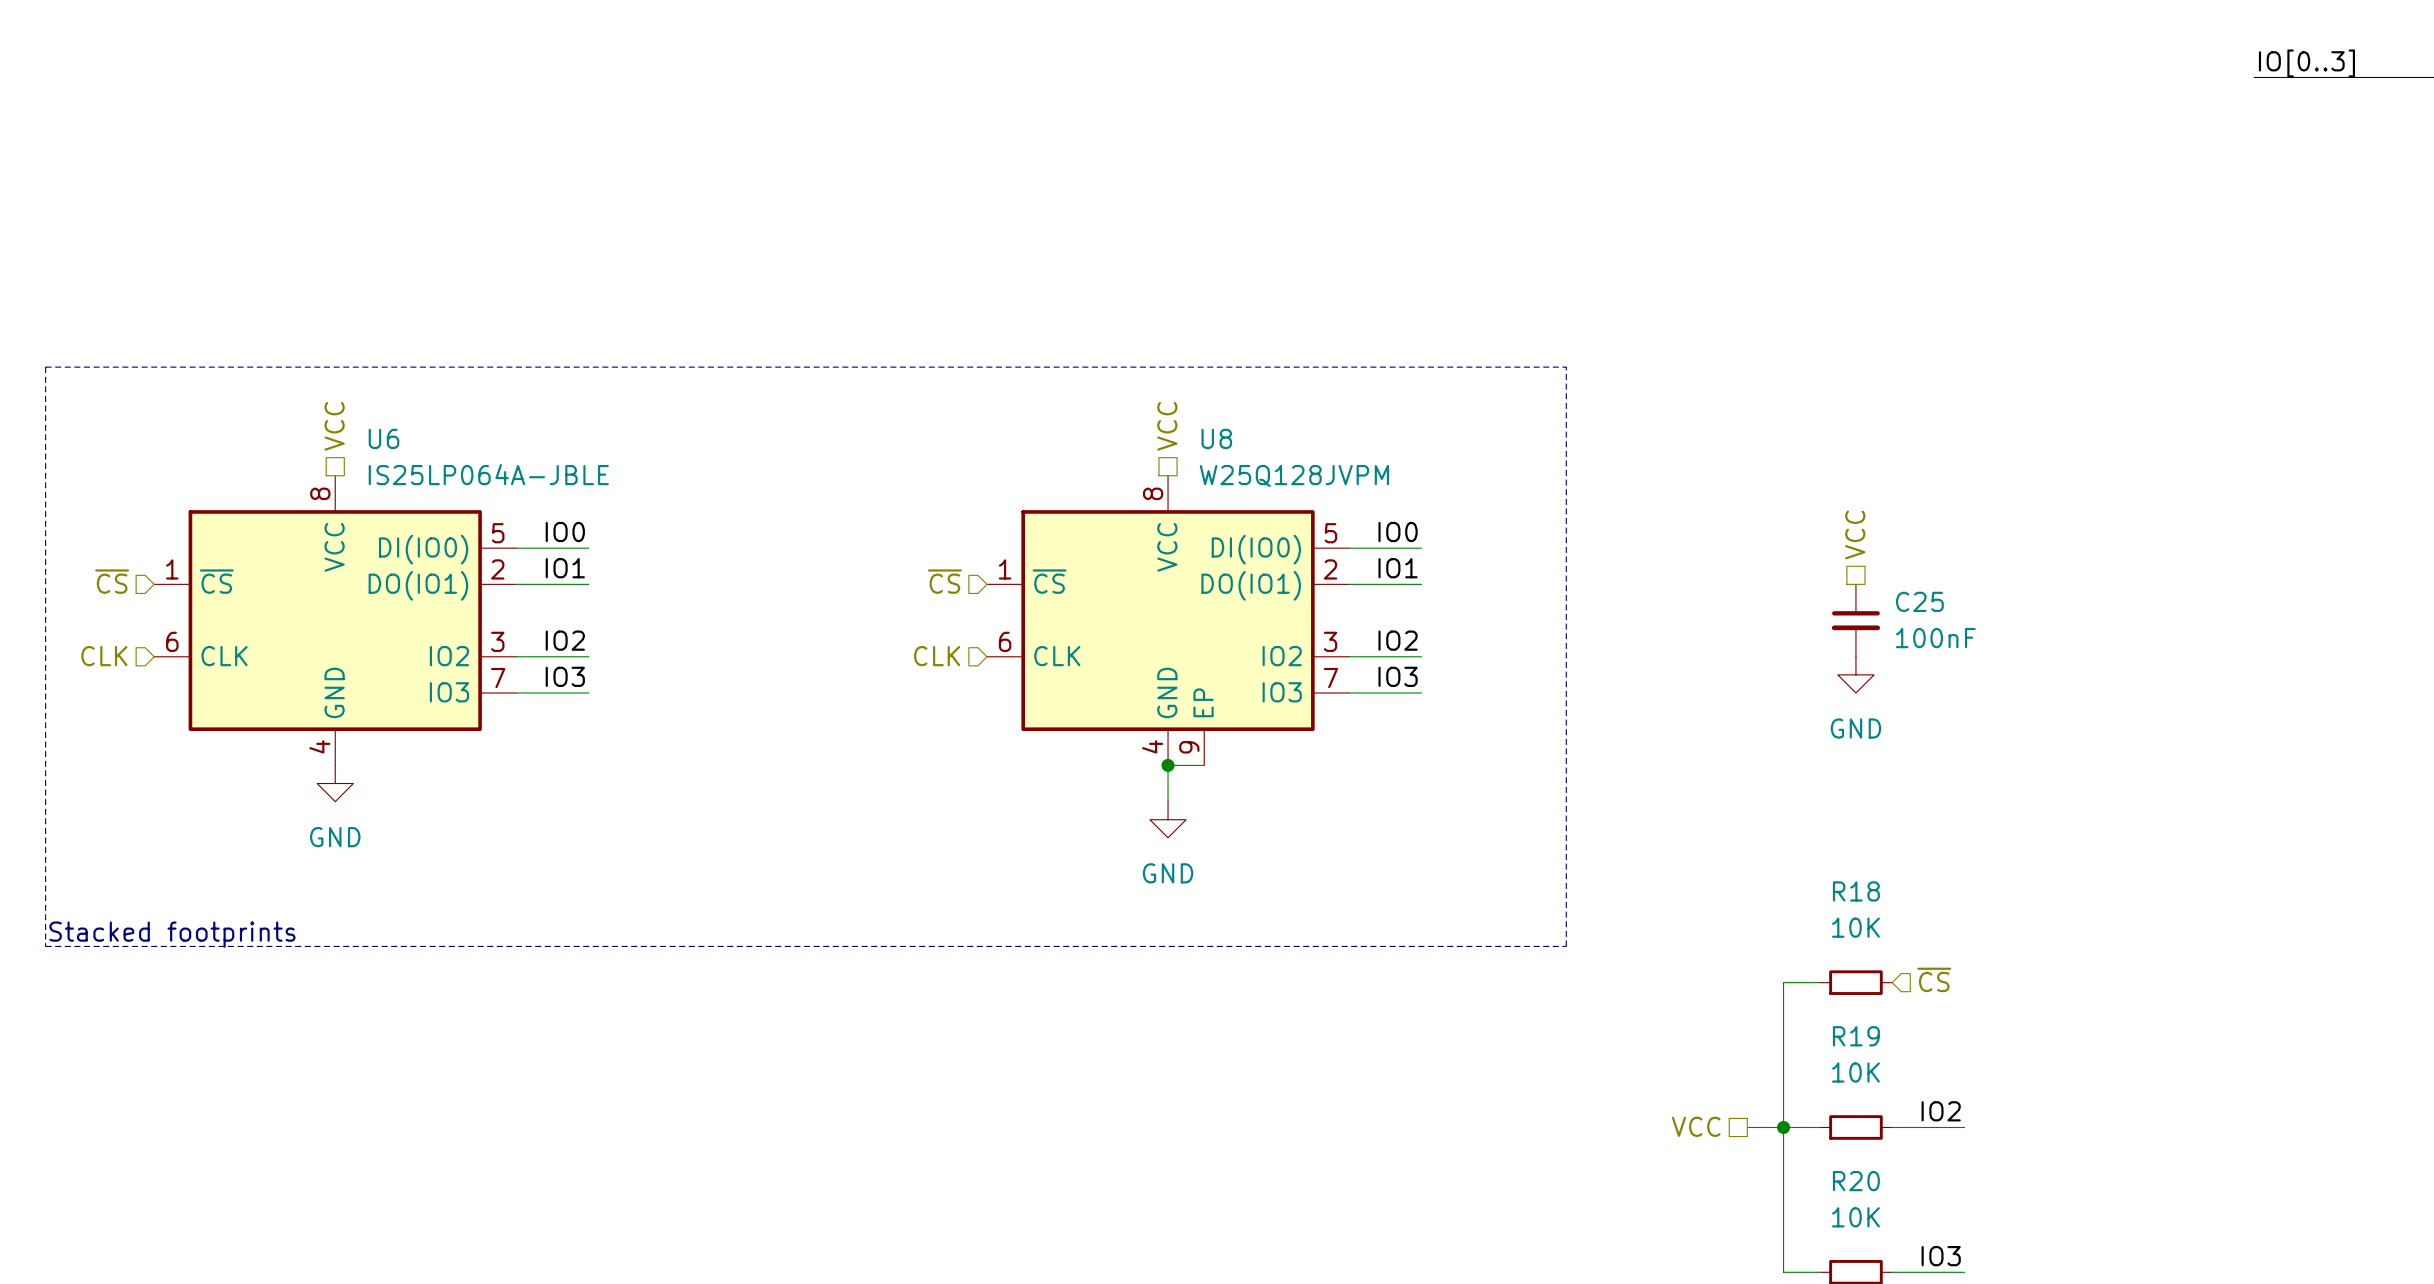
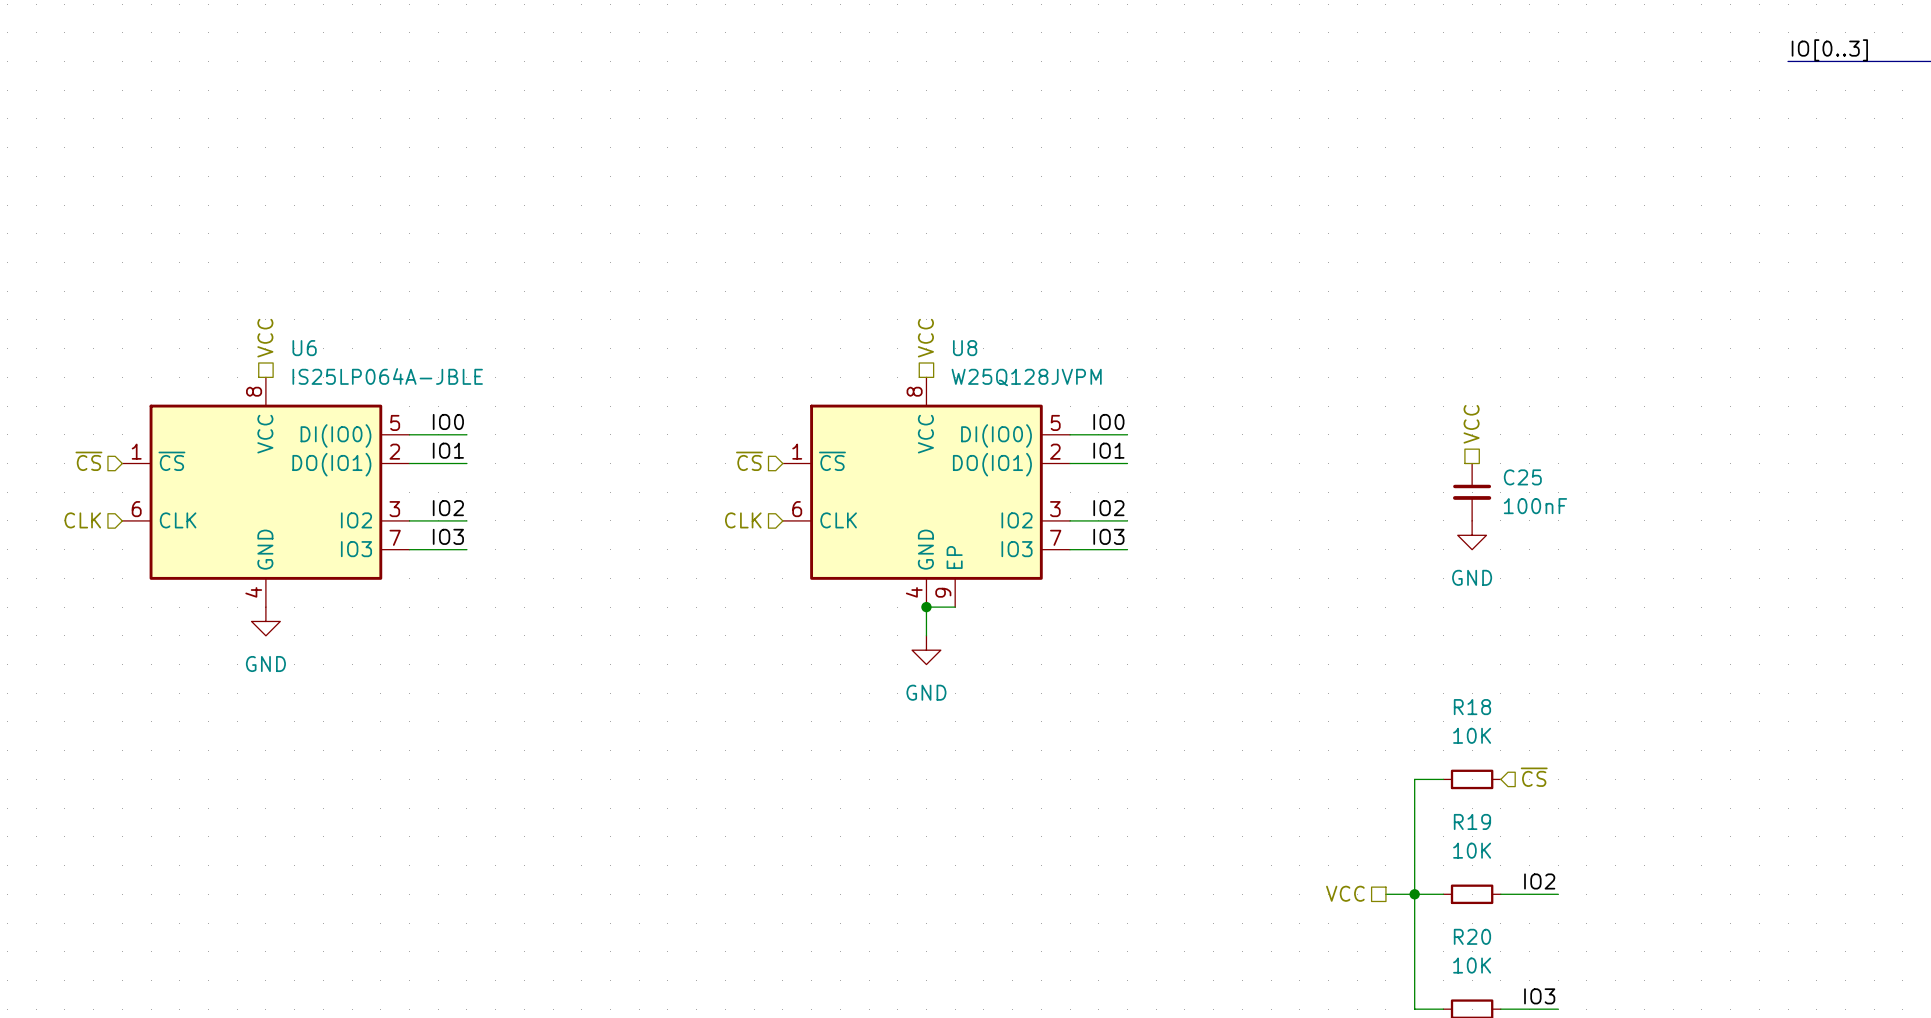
line: (45, 367) (45, 946) (1566, 946) (1566, 367) (45, 367) -> none
text: Stacked footprints (172, 934) -> none

